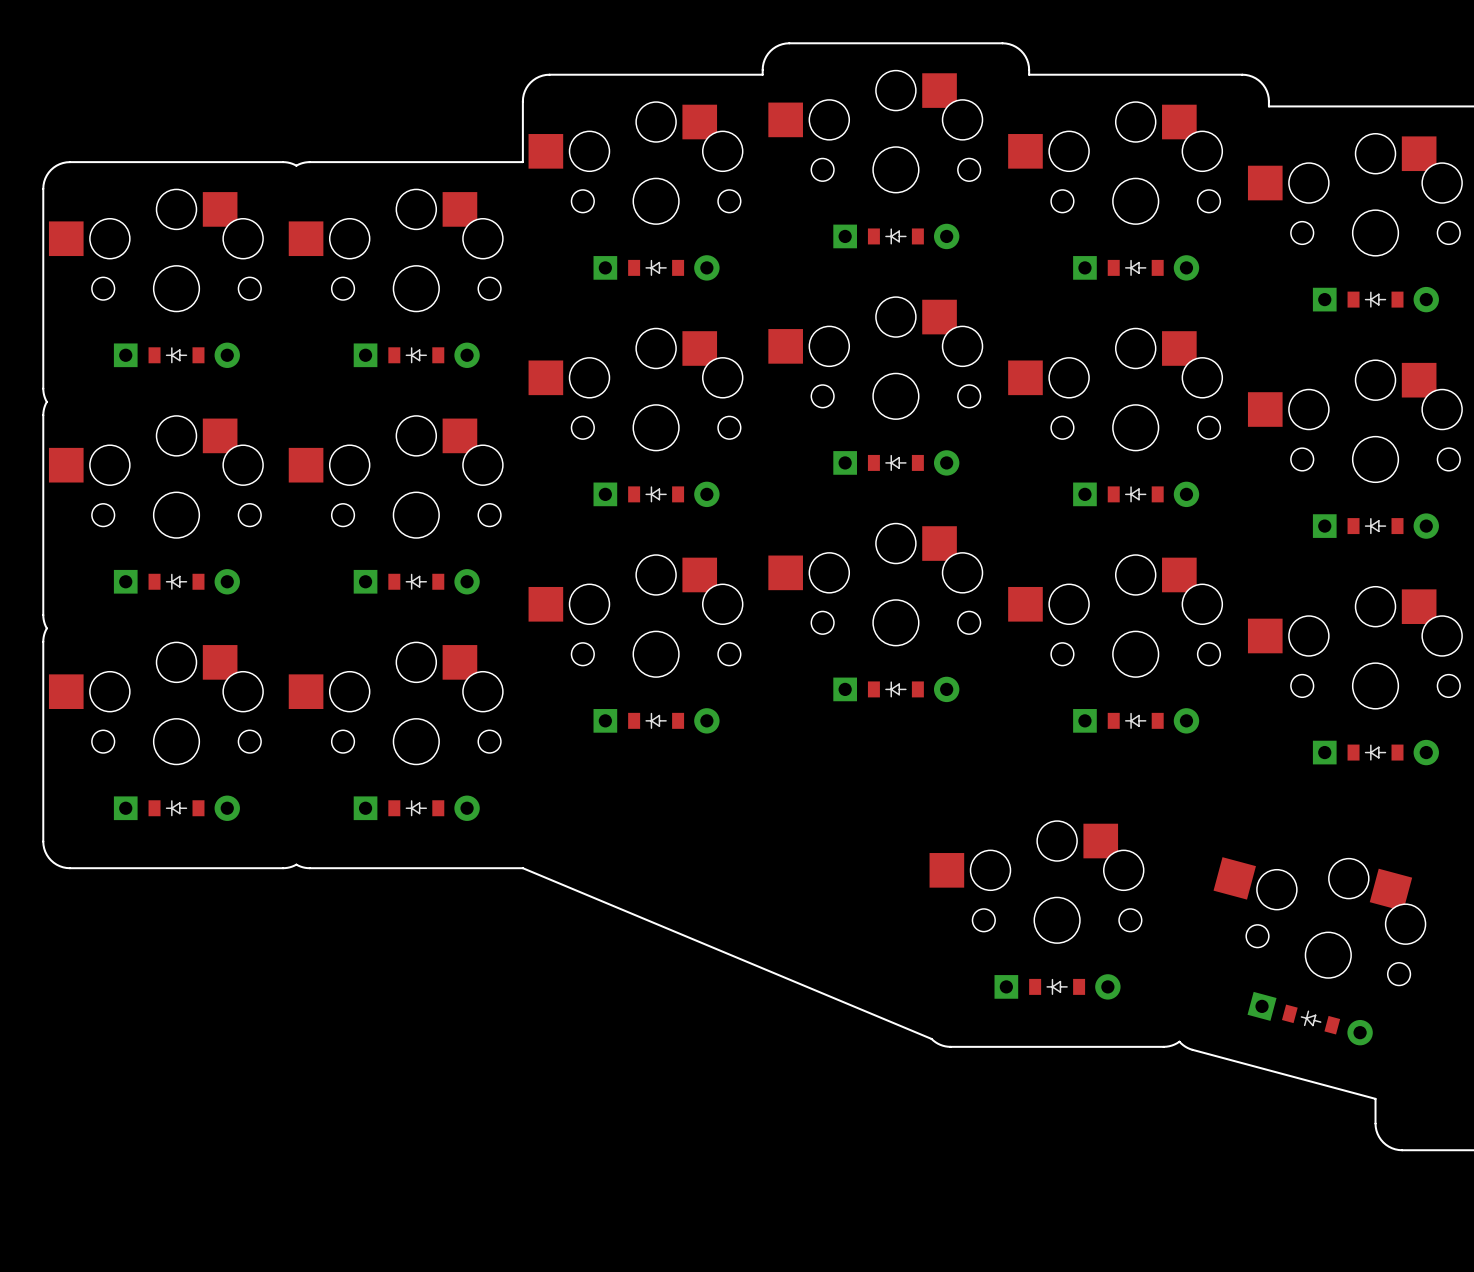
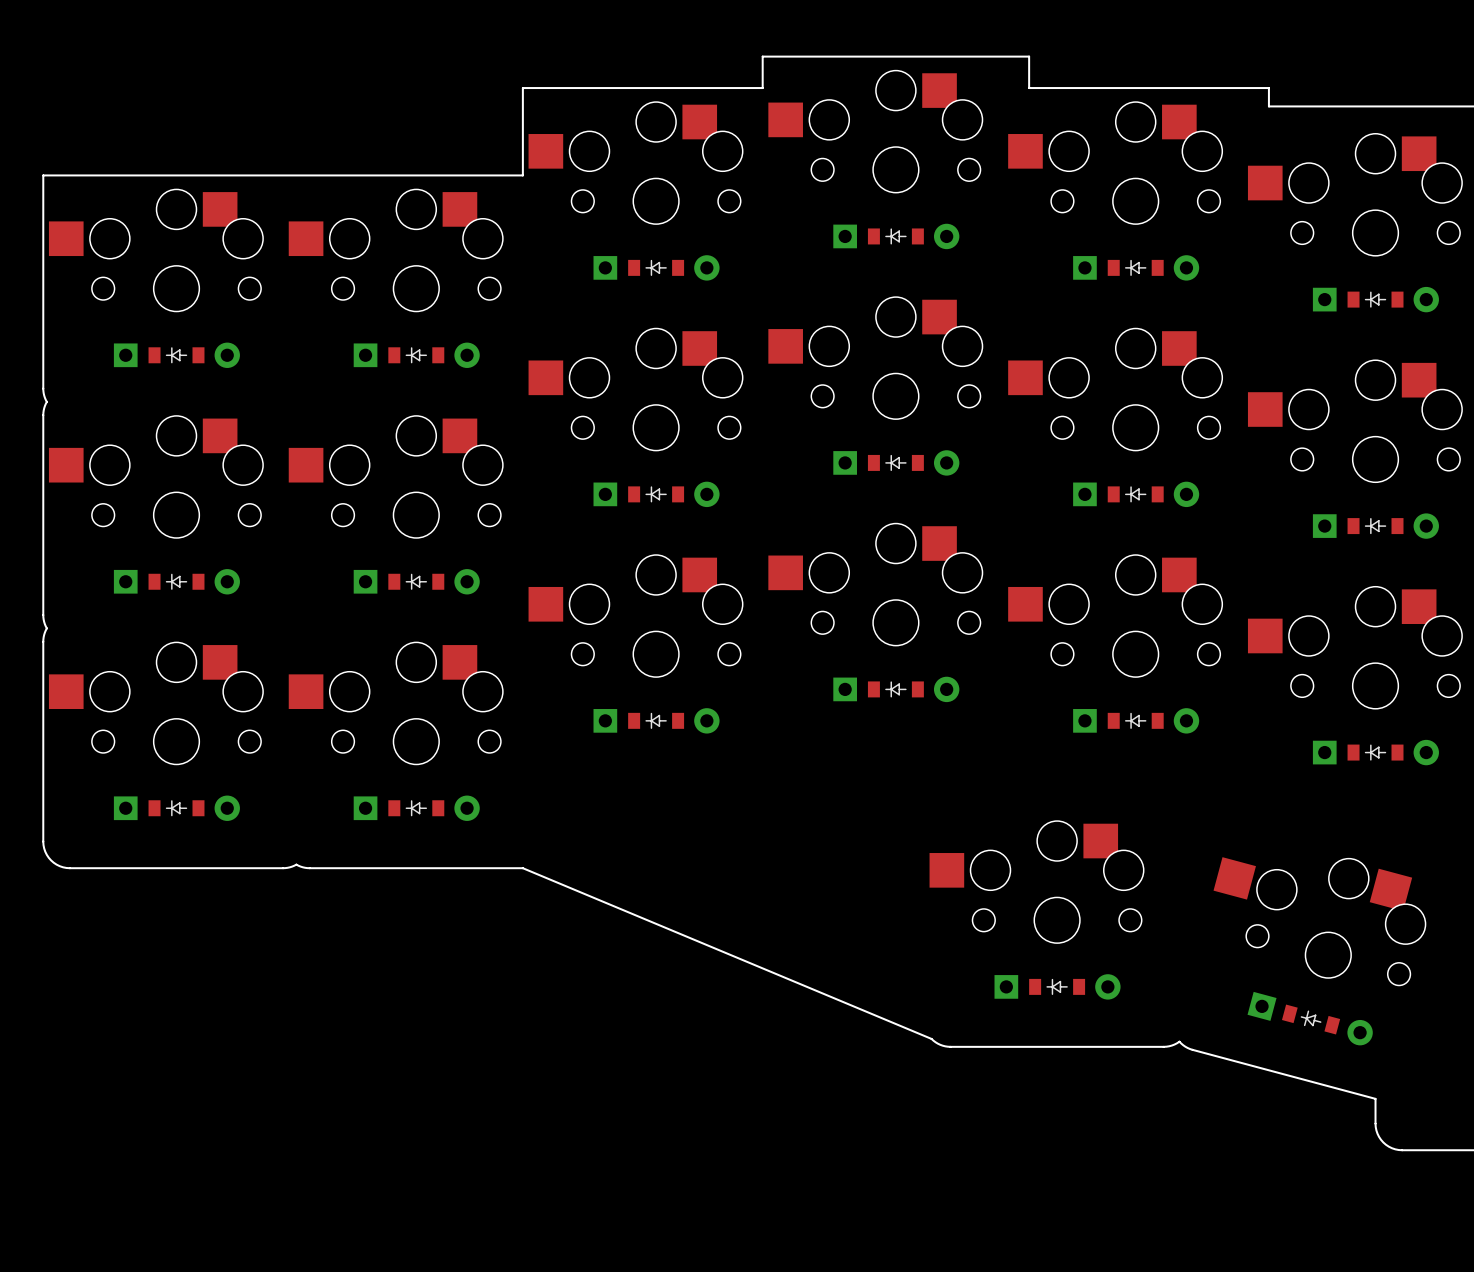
board edge: (762, 69) (764, 59) (770, 51) (779, 45) (789, 43) (1005, 43) (1021, 51) (1027, 59) (1029, 69) -> (762, 69) (762, 56) (1029, 56) (1029, 69)
board edge: (762, 74) (546, 74) (536, 78) (528, 85) (522, 101) -> (762, 74) (762, 88) (522, 88) (522, 101)
board edge: (1029, 74) (1245, 74) (1261, 82) (1266, 91) (1268, 101) -> (1029, 74) (1029, 88) (1268, 88) (1268, 101)
board edge: (522, 162) (309, 162) (296, 165) (283, 162) (69, 162) (59, 164) (51, 169) (45, 178) (43, 188) -> (522, 162) (522, 175) (43, 175) (43, 188)

